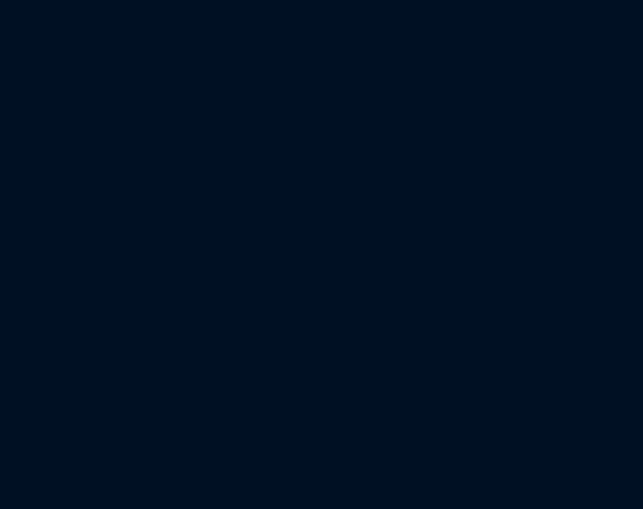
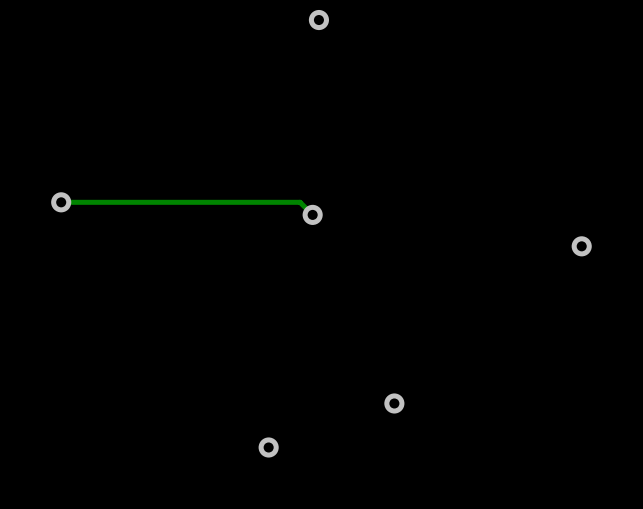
via: none -> (318, 20)
track: none -> (61, 202) (300, 202) (312, 214)
via: none -> (61, 202)
via: none -> (312, 214)
via: none -> (581, 246)
via: none -> (394, 403)
via: none -> (268, 447)

